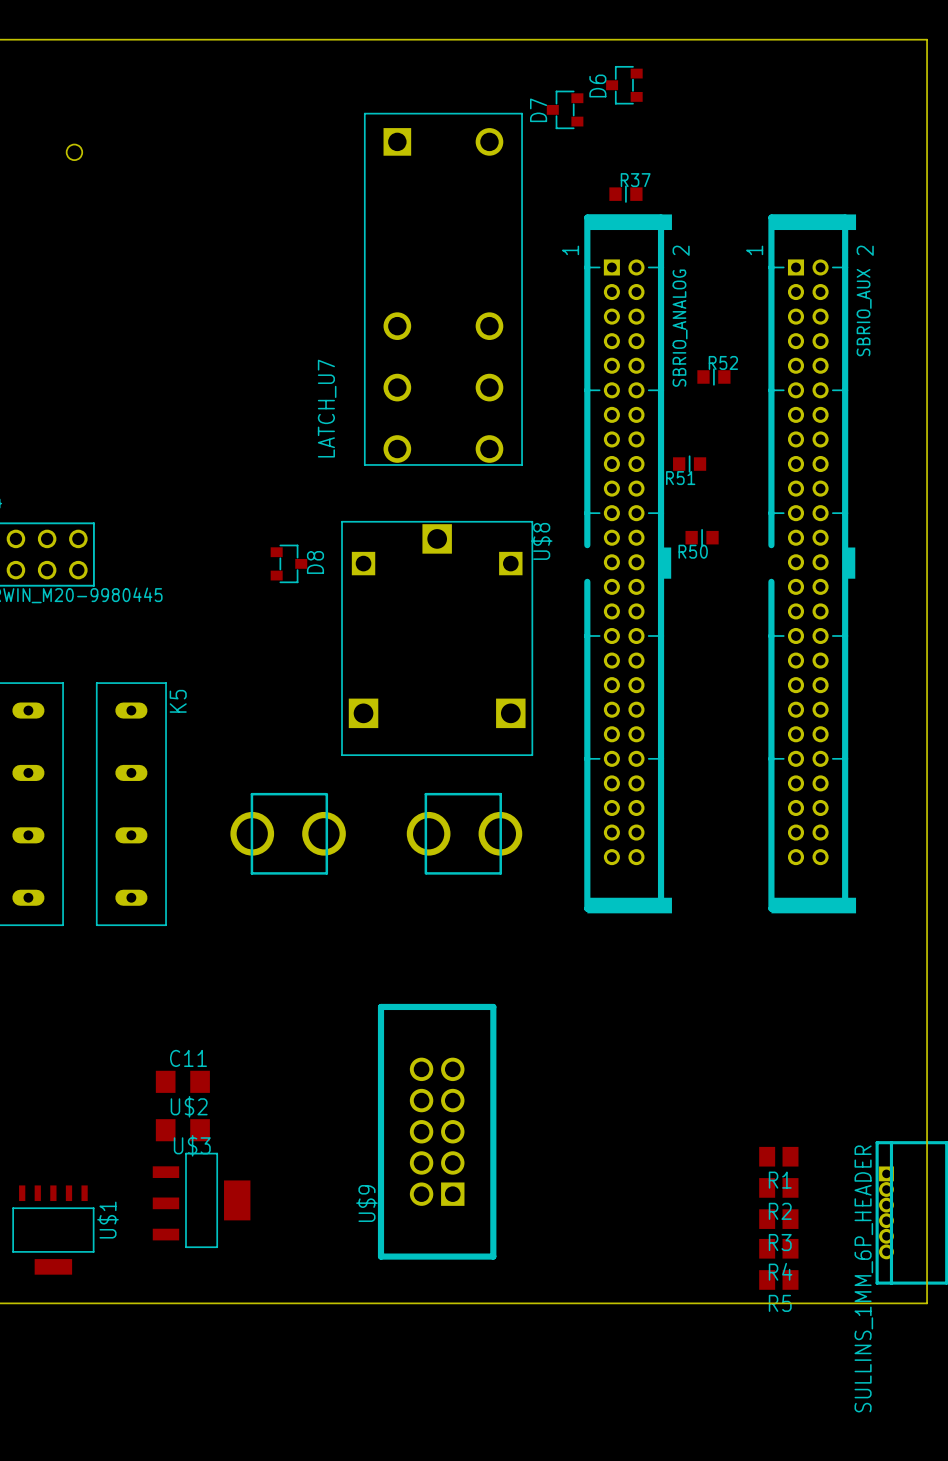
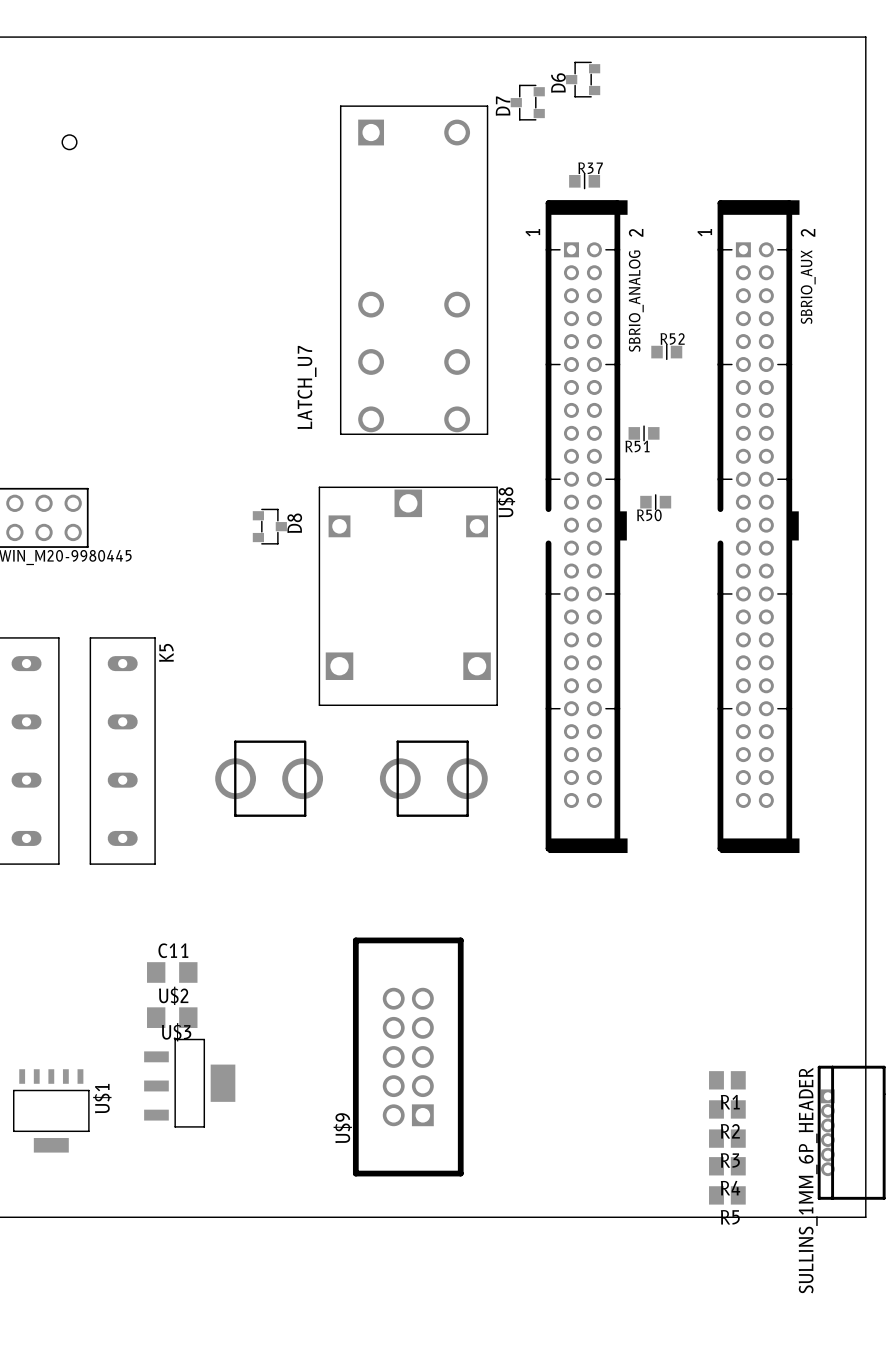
C11 position: (182, 1081) -> (172, 972)
U$2 position: (182, 1130) -> (172, 1017)
U$3 position: (201, 1200) -> (189, 1083)
U$1 position: (53, 1230) -> (51, 1110)

